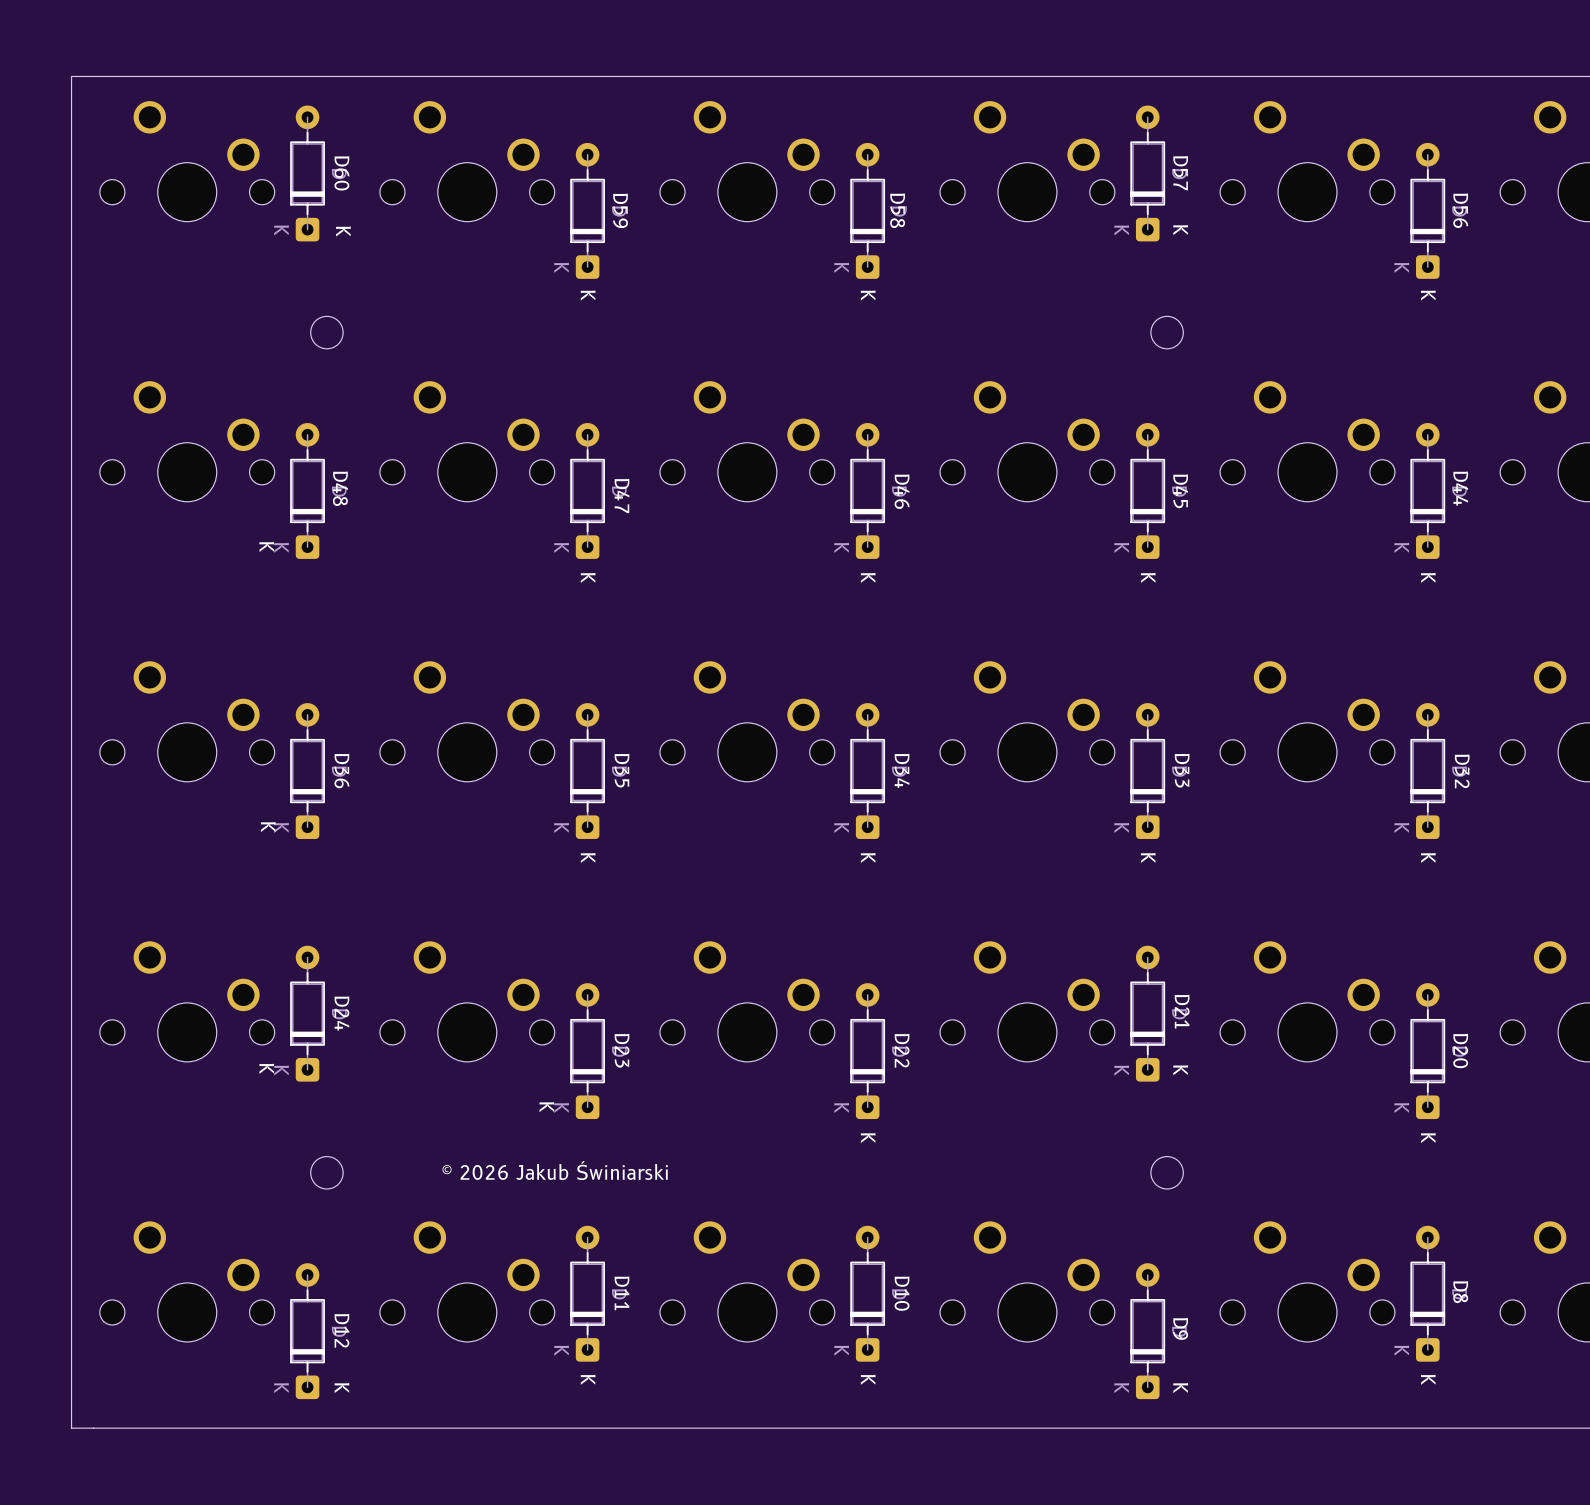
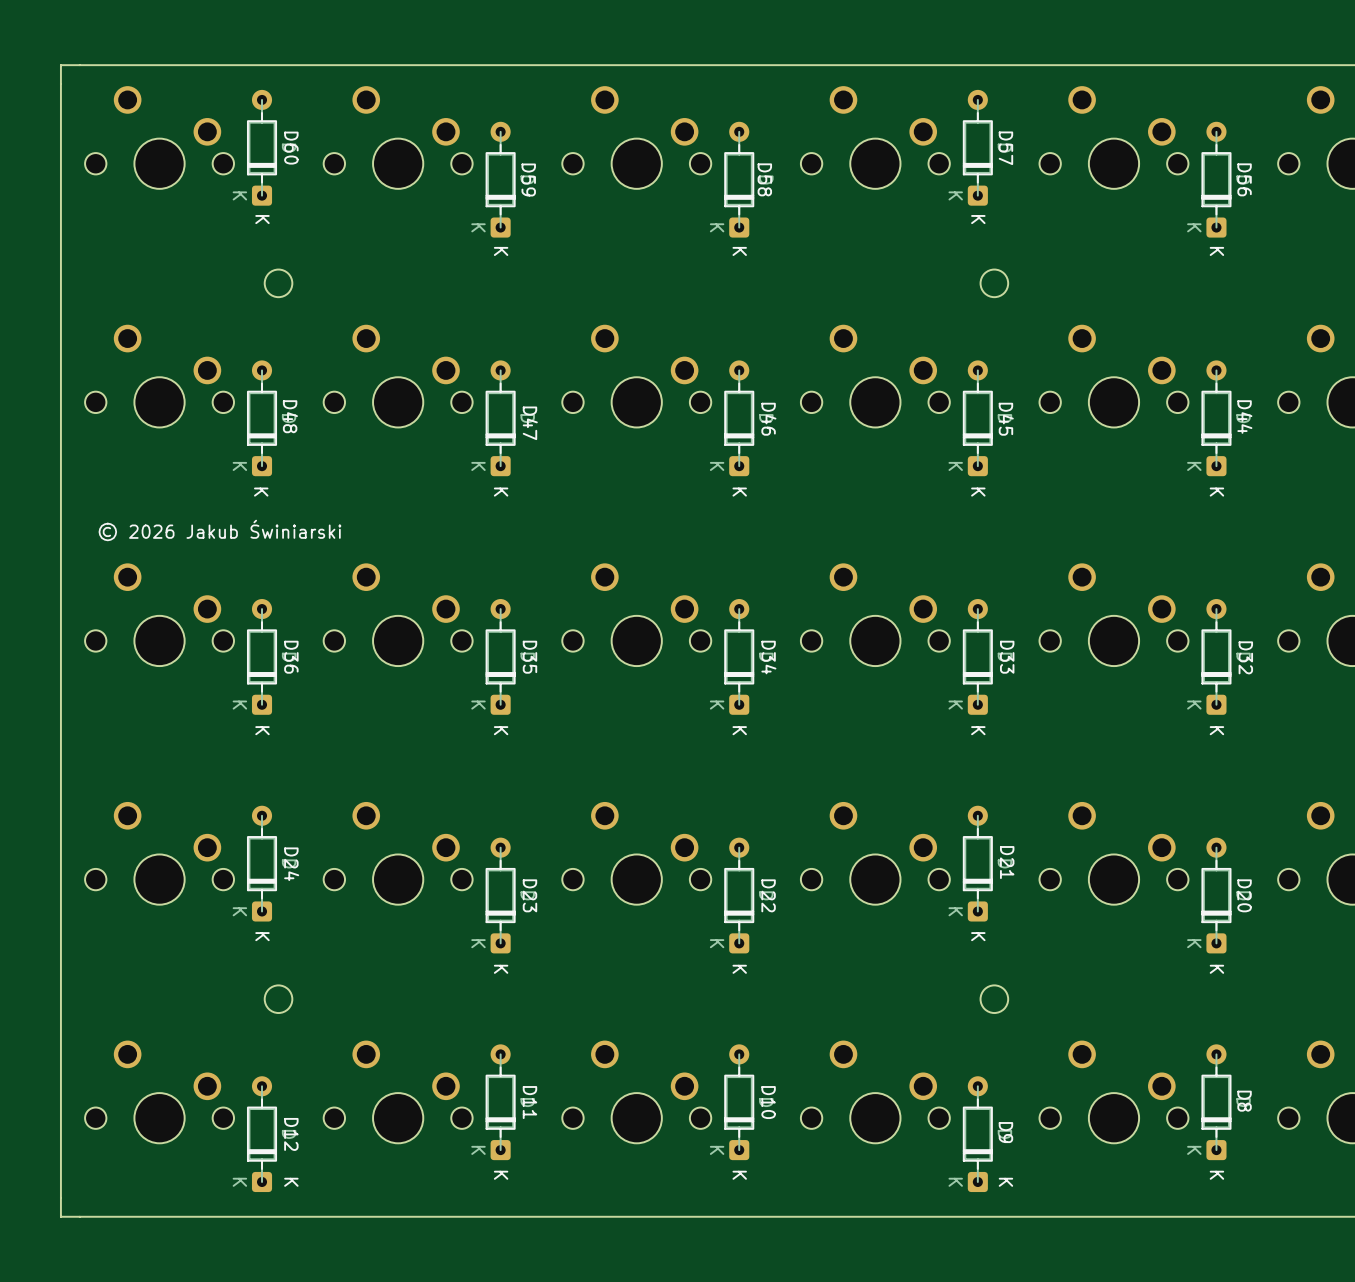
D57 text position: K (1180, 230) -> K (978, 219)
D60 text position: K (343, 231) -> K (262, 219)
D48 text position: K (266, 546) -> K (261, 492)
text: none -> © 2026 Jakub Świniarski (219, 530)
D36 text position: K (268, 827) -> K (262, 730)
D24 text position: K (266, 1068) -> K (262, 936)
D21 text position: K (1180, 1070) -> K (978, 936)
D23 text position: K (546, 1107) -> K (501, 969)
text: © 2026 Jakub Świniarski (555, 1170) -> none

